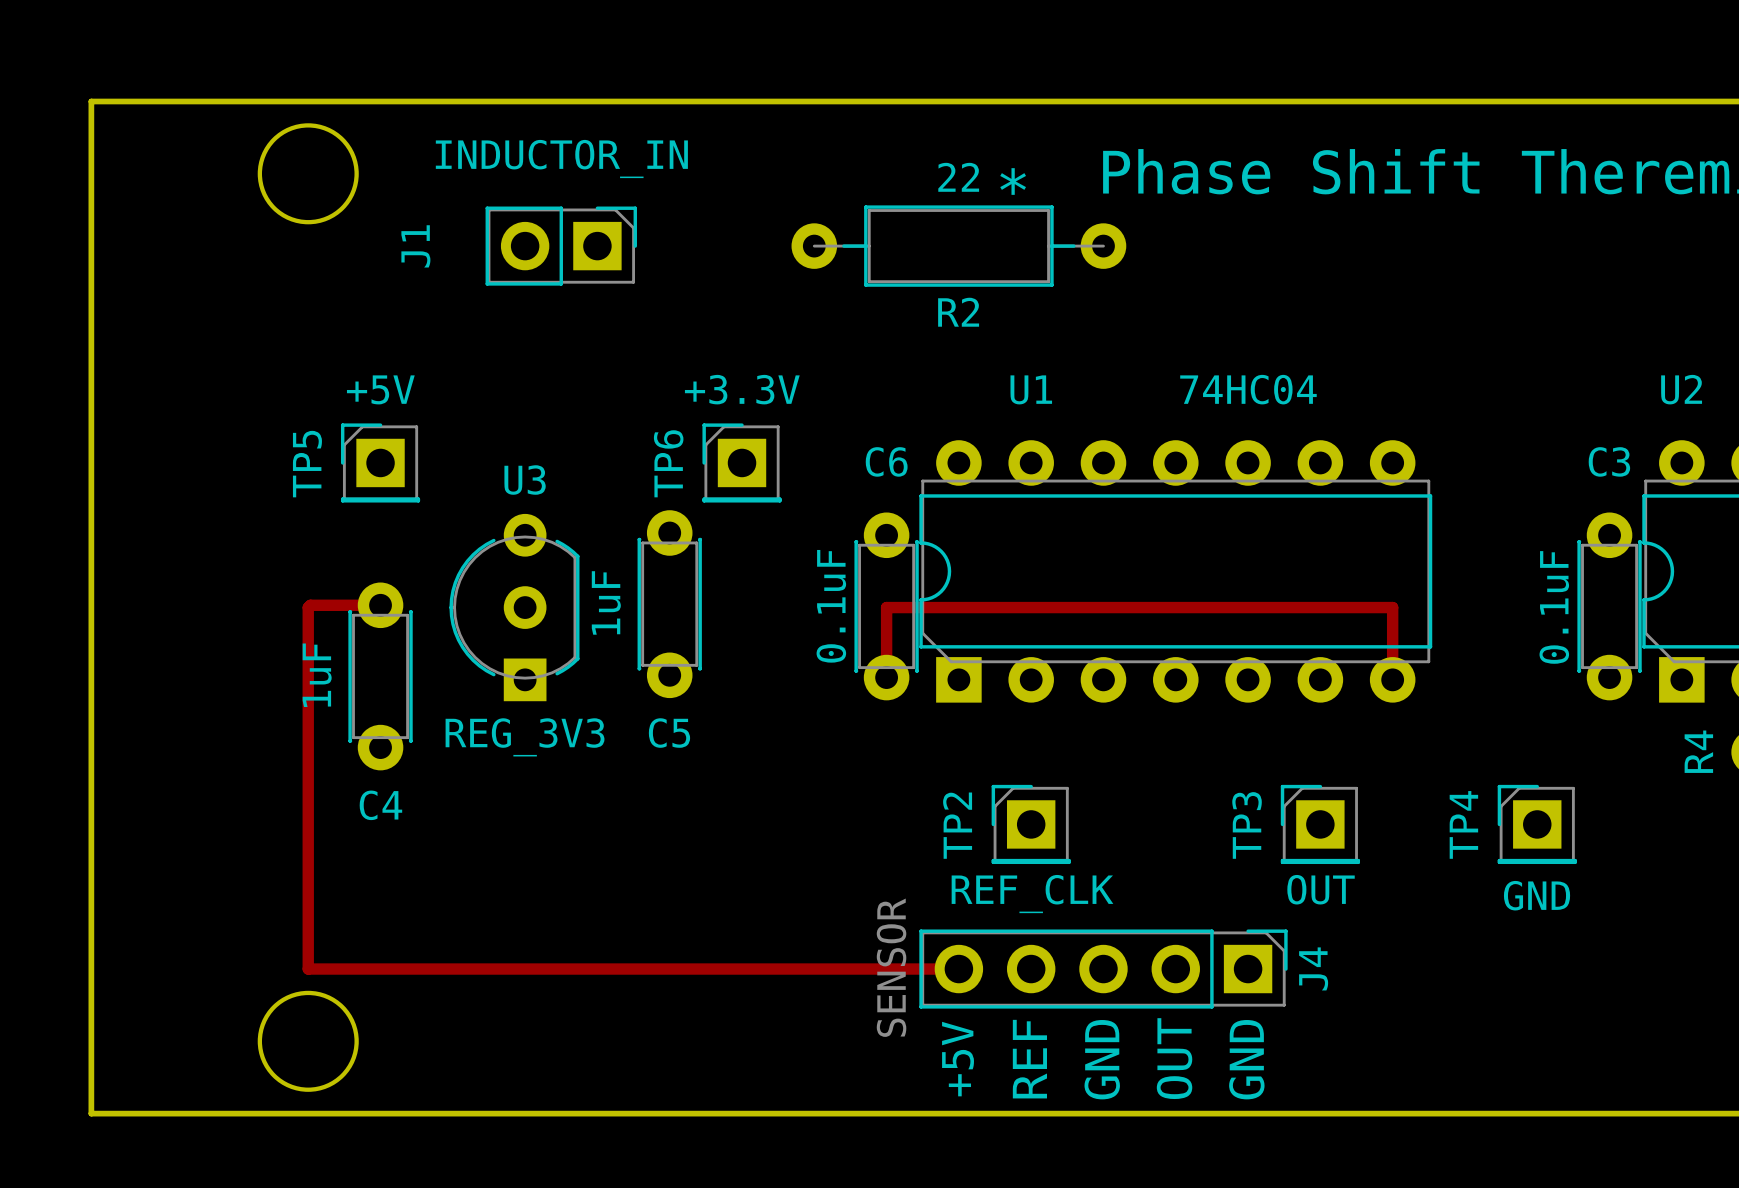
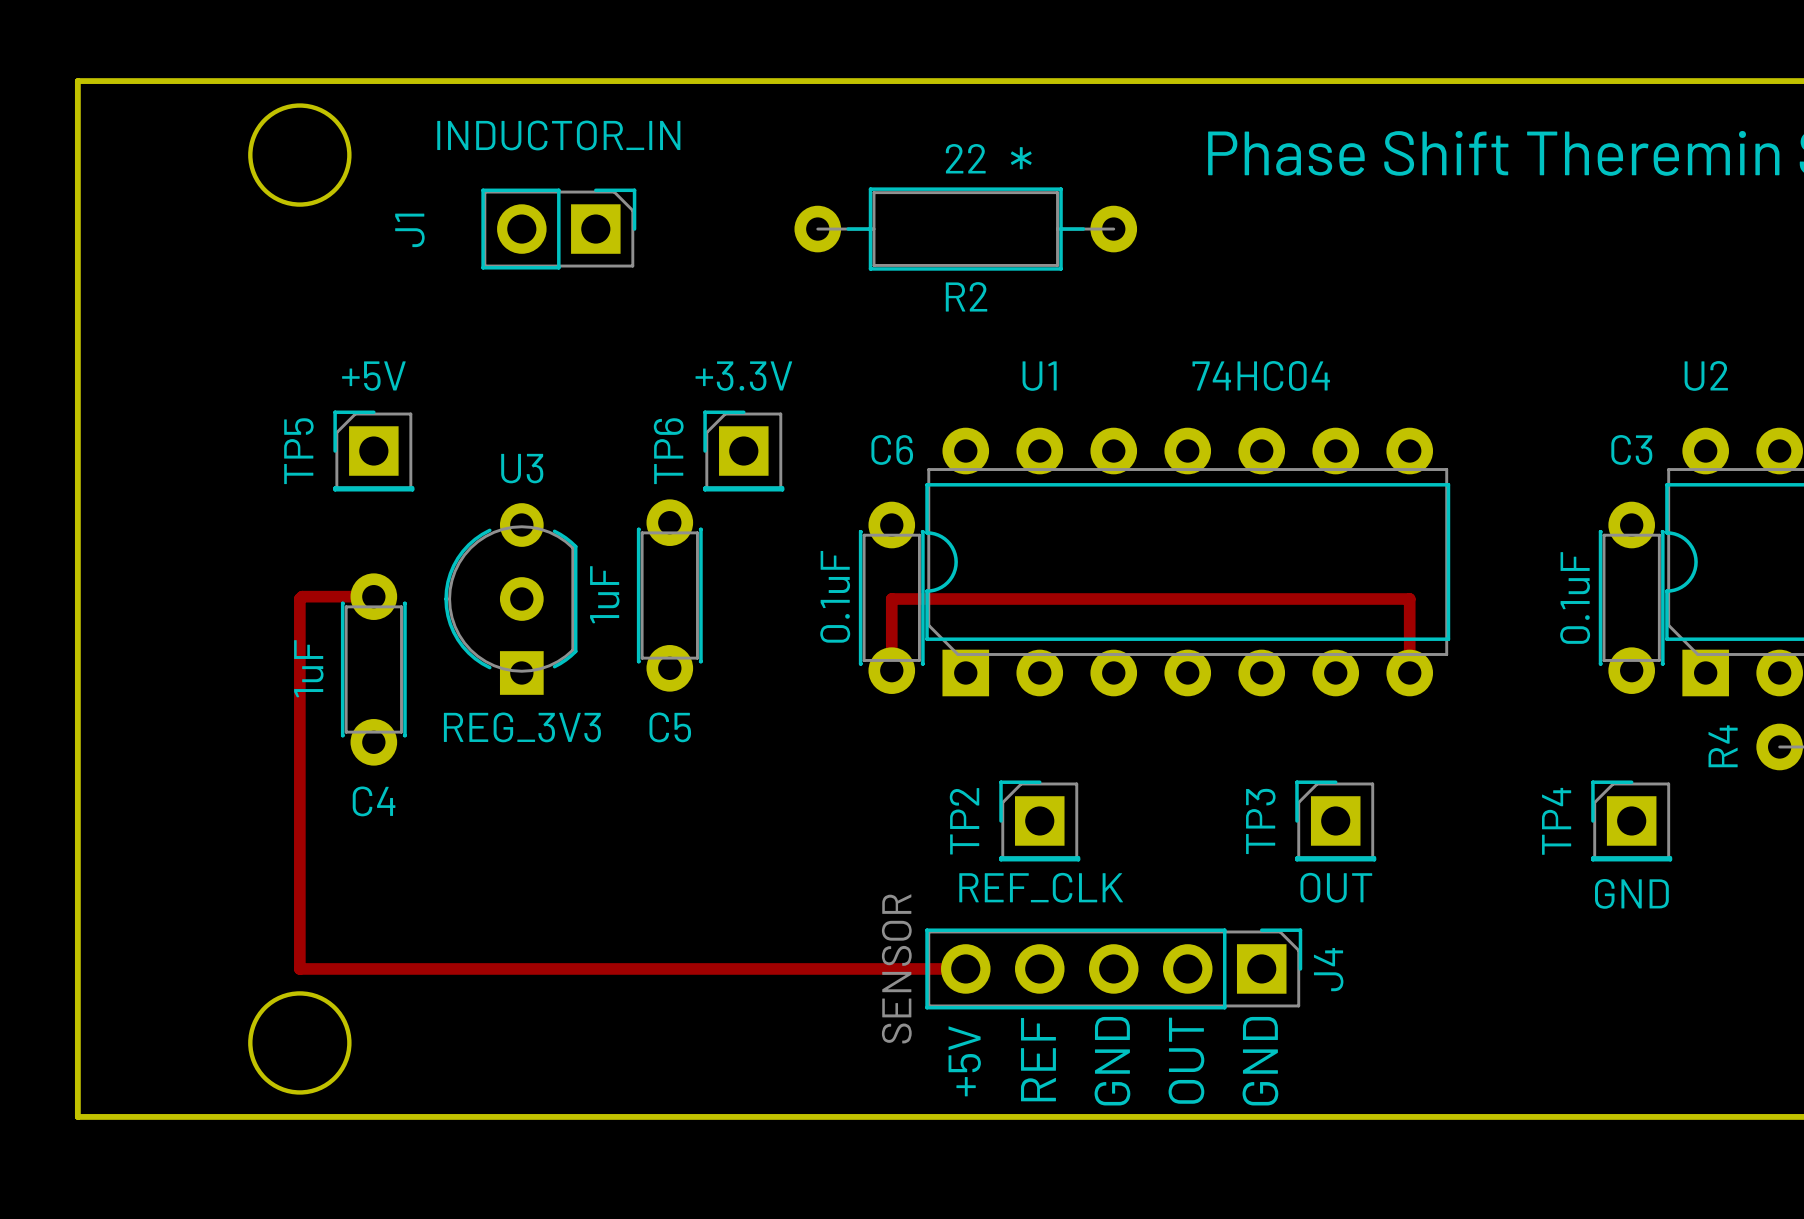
TP4 position: (1537, 824) -> (1631, 820)

